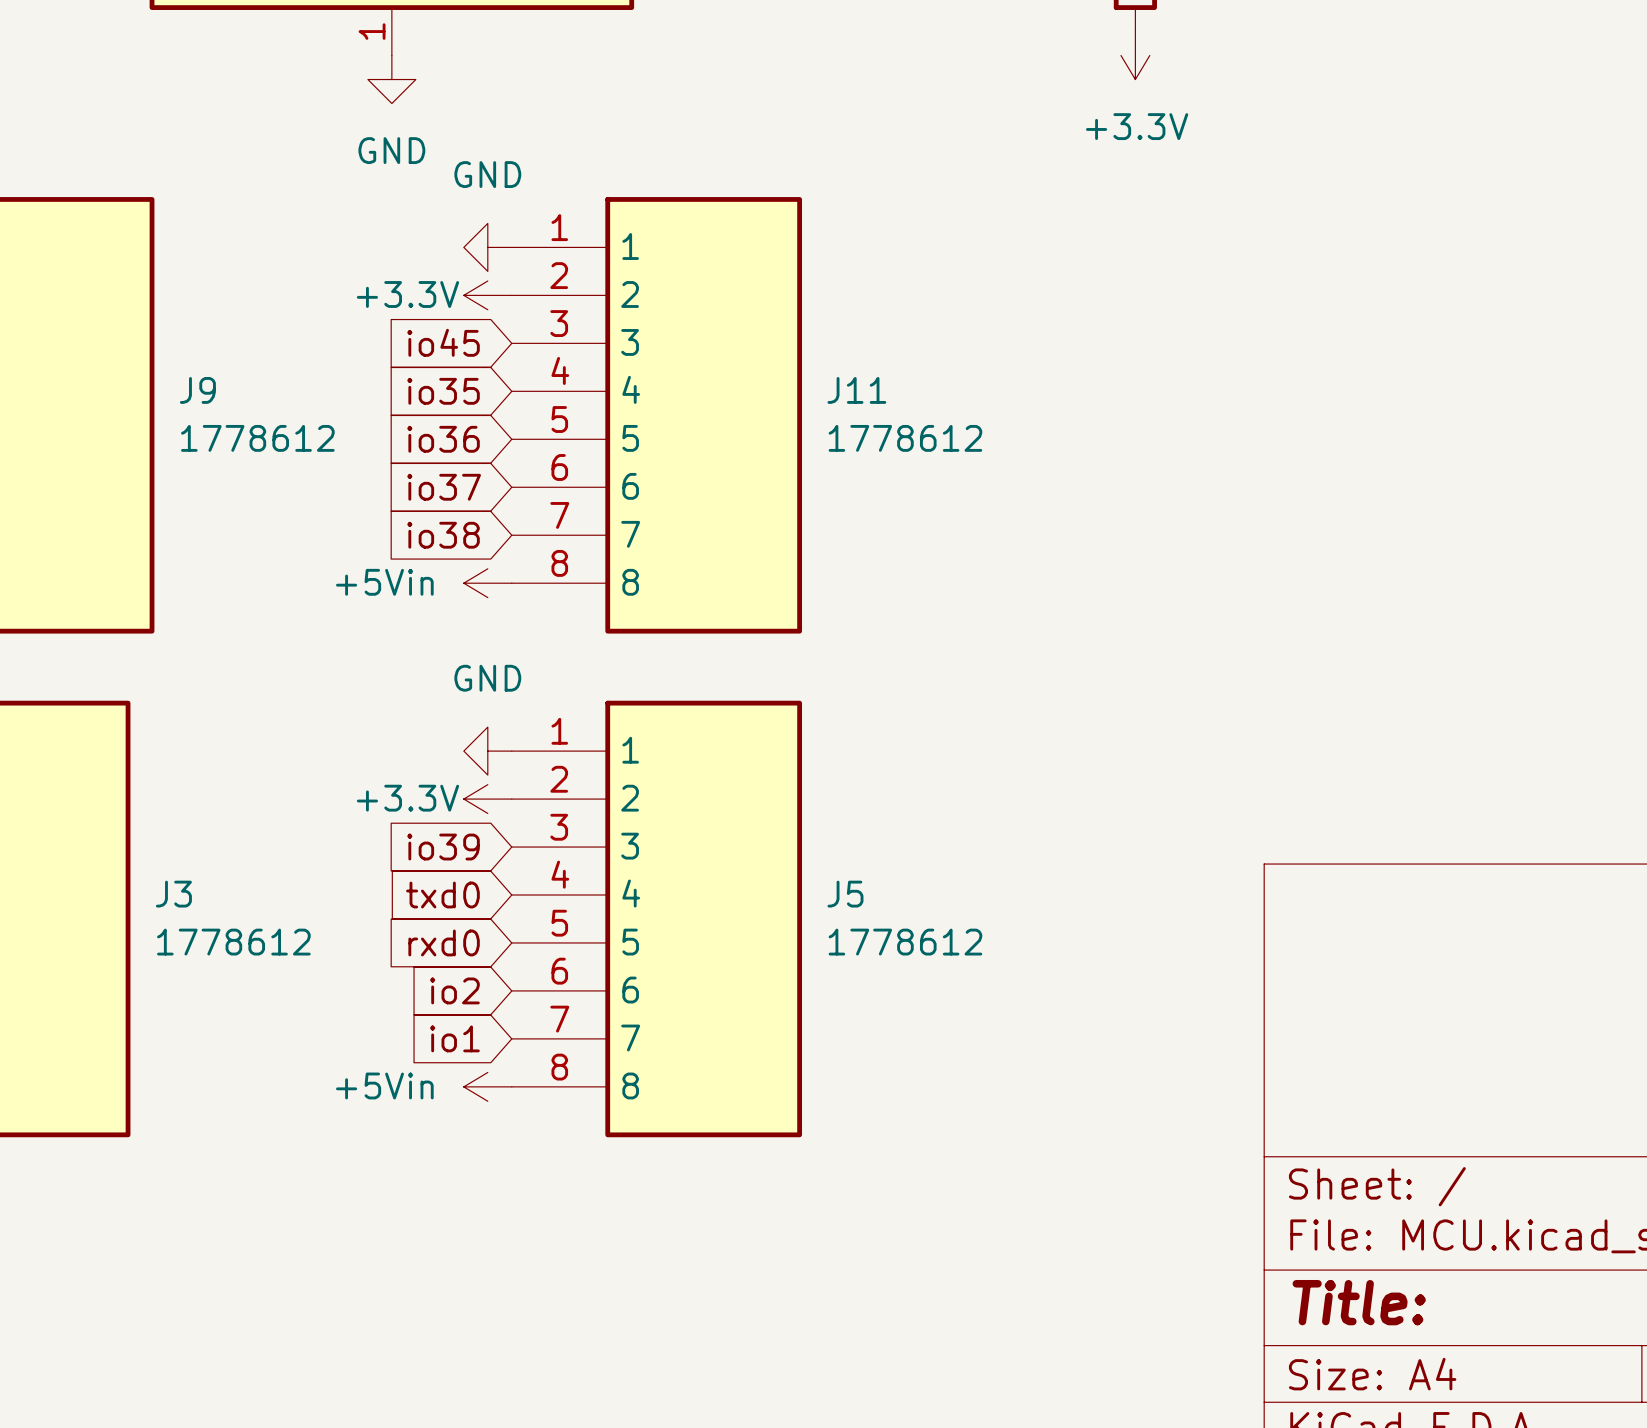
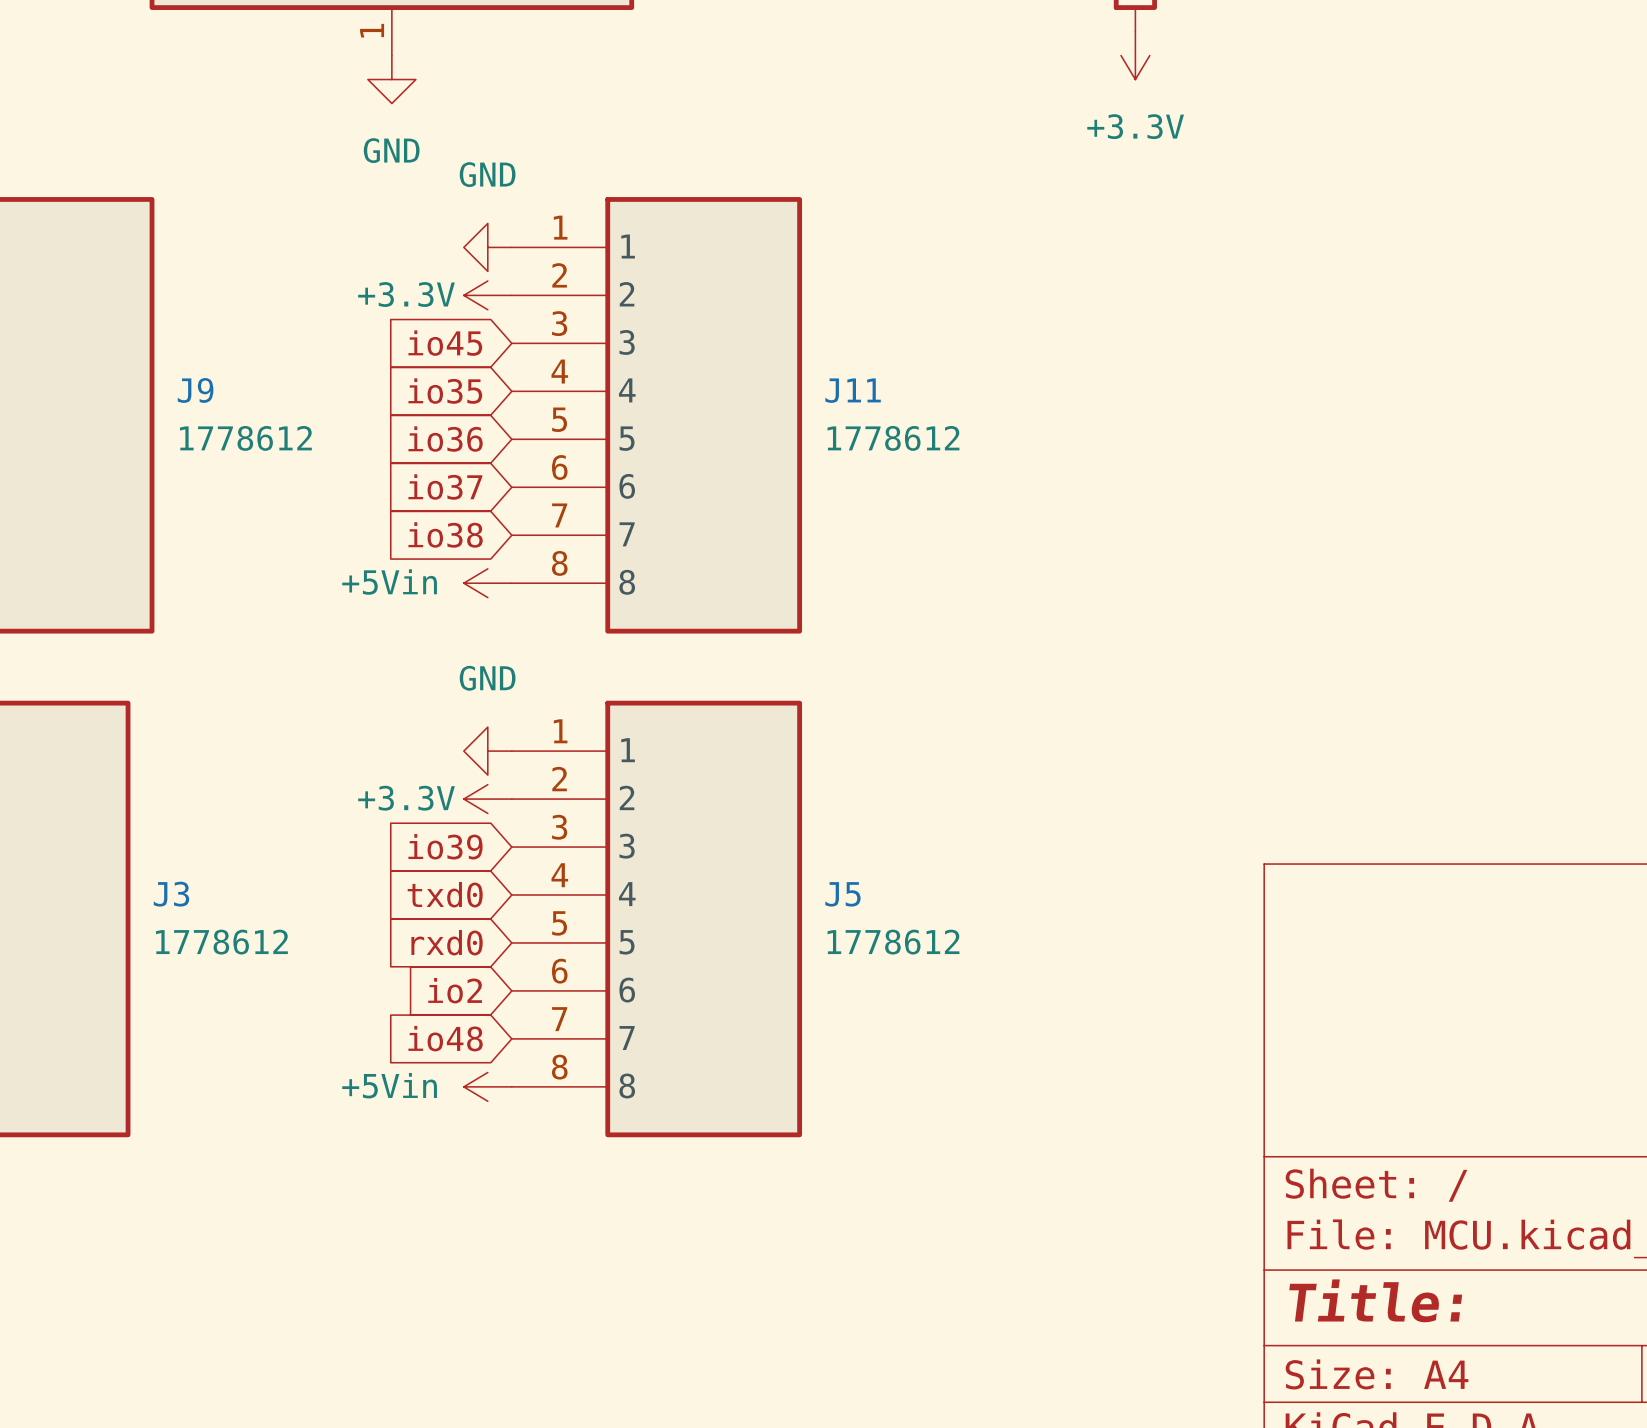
global label: io1 (454, 1038) -> io48 (445, 1038)

